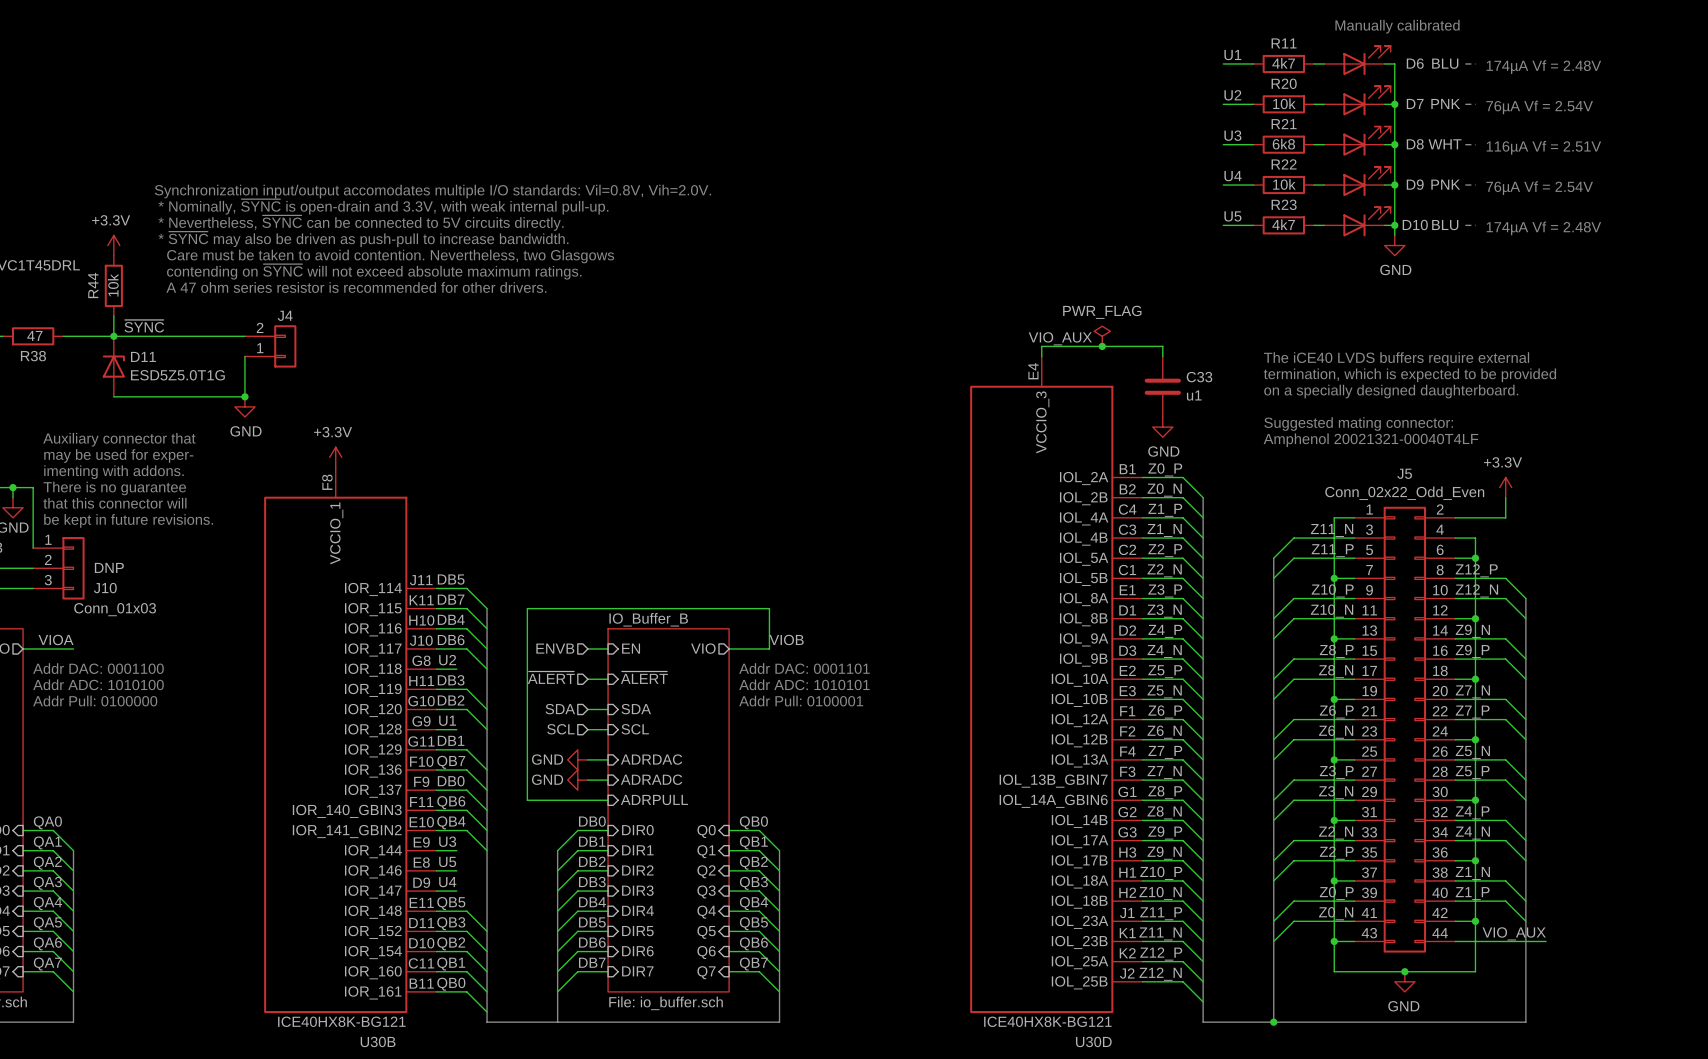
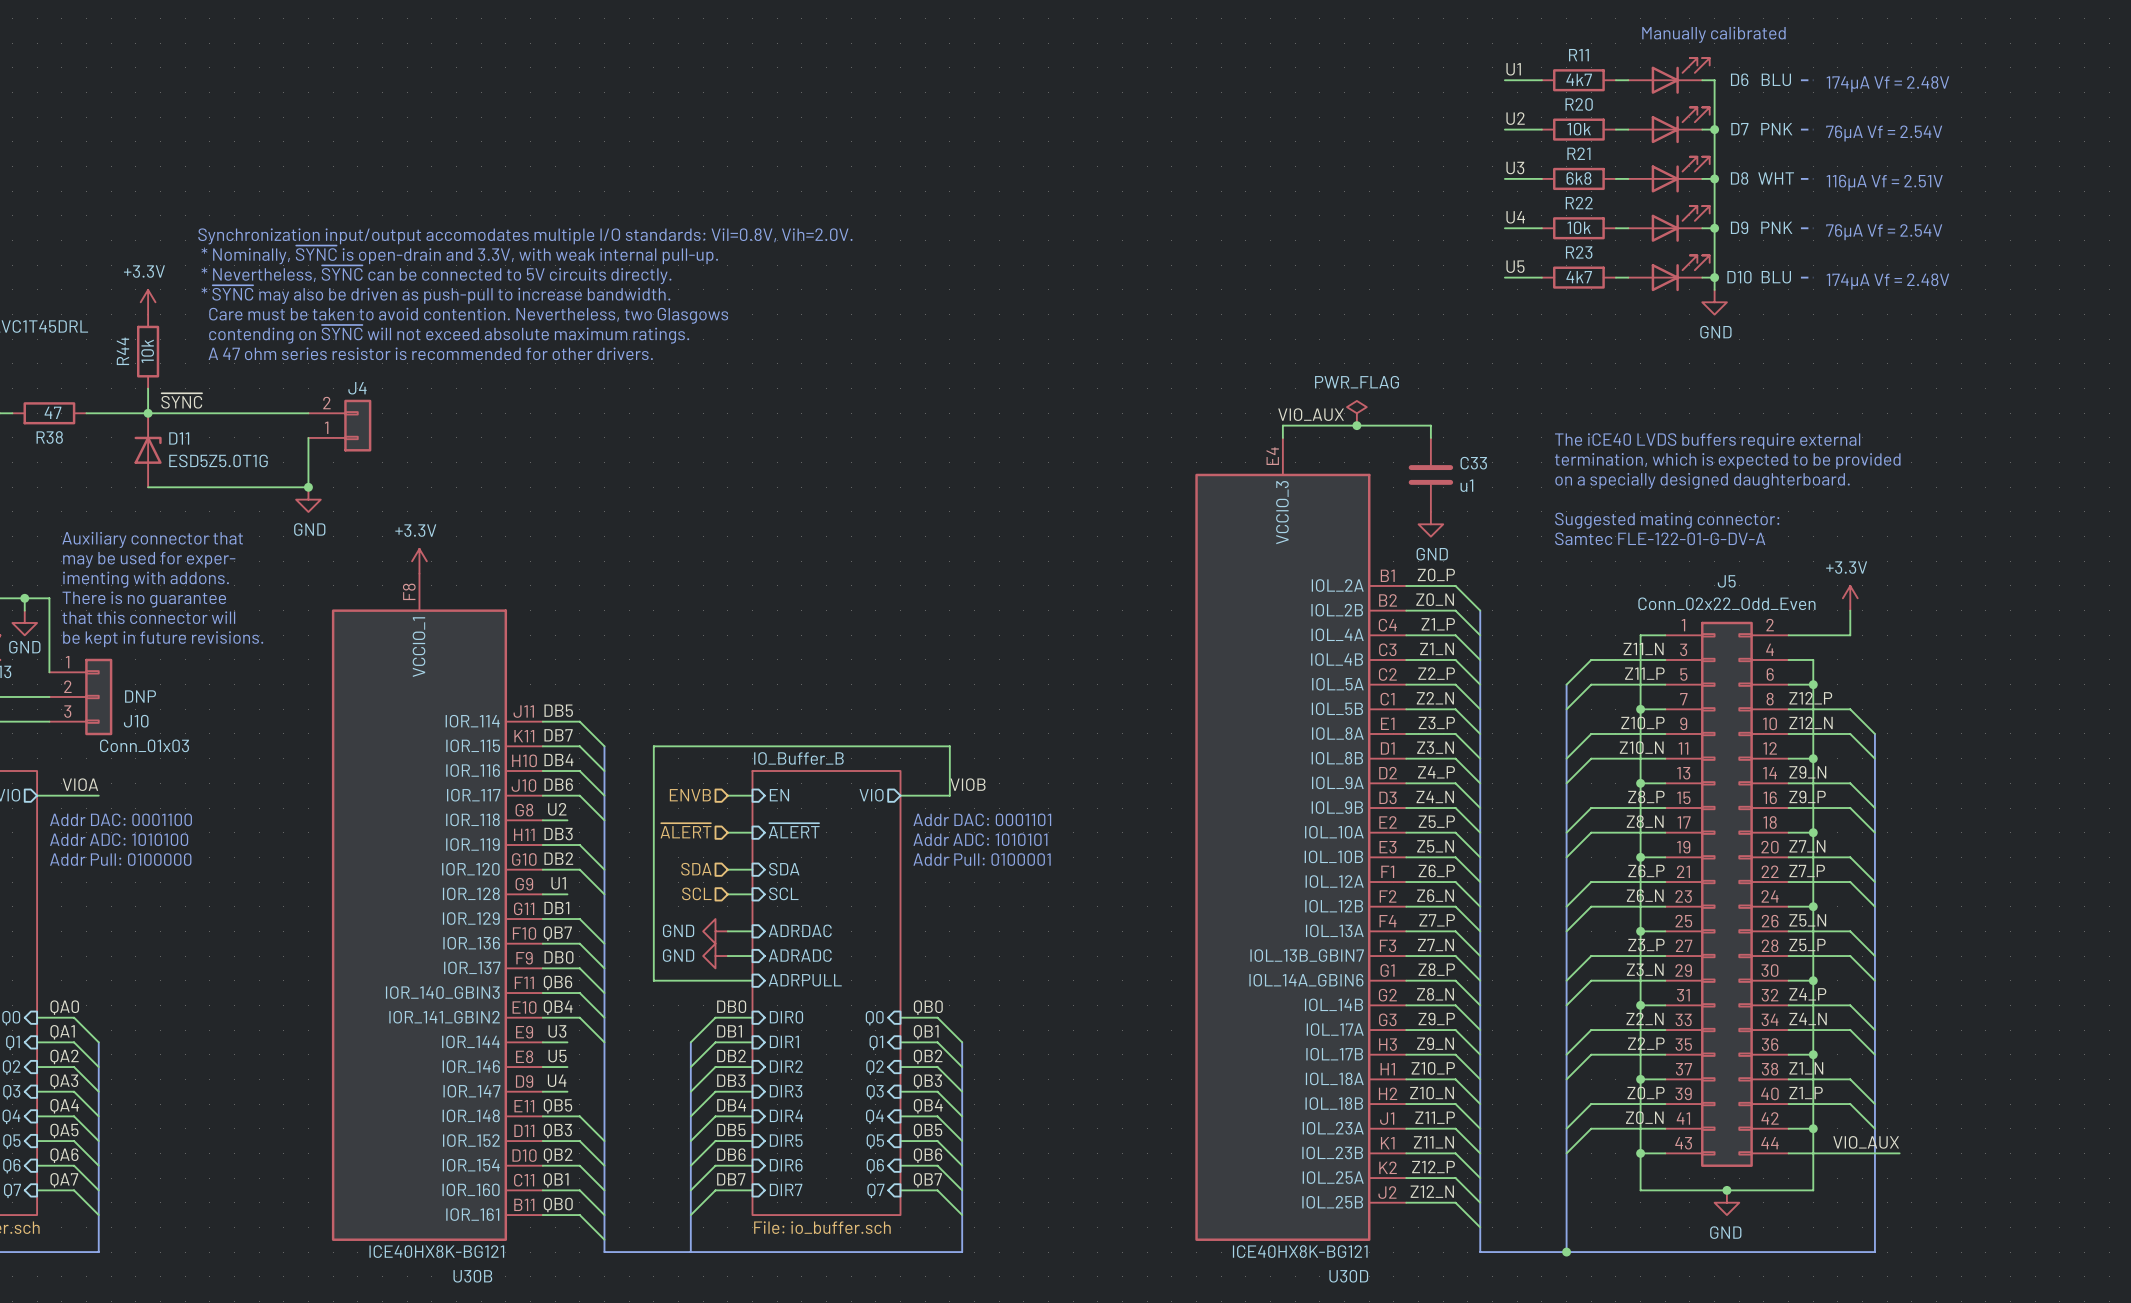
text: Amphenol 20021321-00040T4LF (1370, 440) -> Samtec FLE-122-01-G-DV-A (1660, 538)

